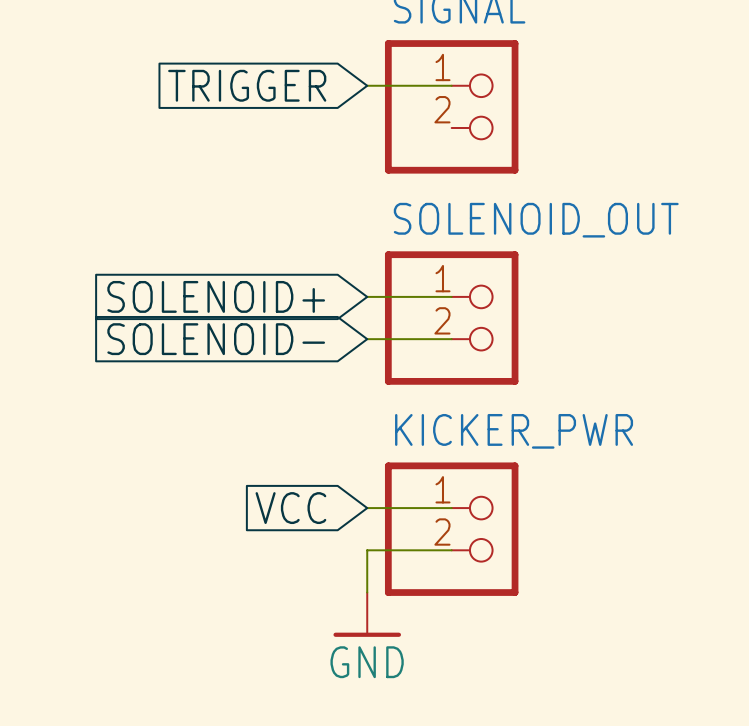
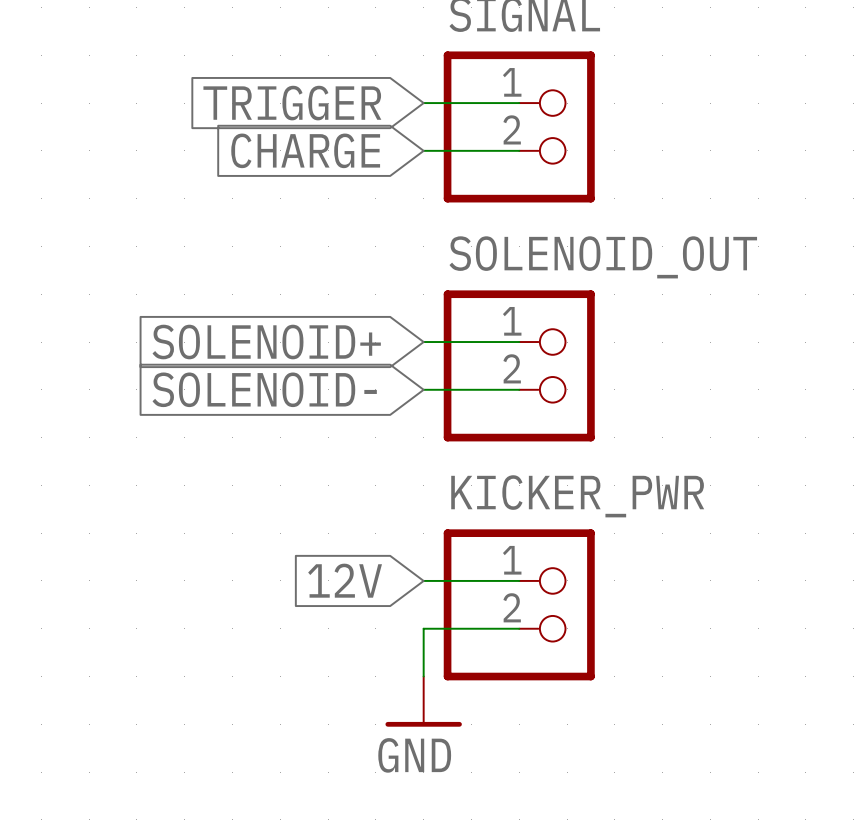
global label: none -> CHARGE (305, 150)
wire: none -> (423, 150) (519, 150)
global label: VCC (290, 508) -> 12V (345, 580)

